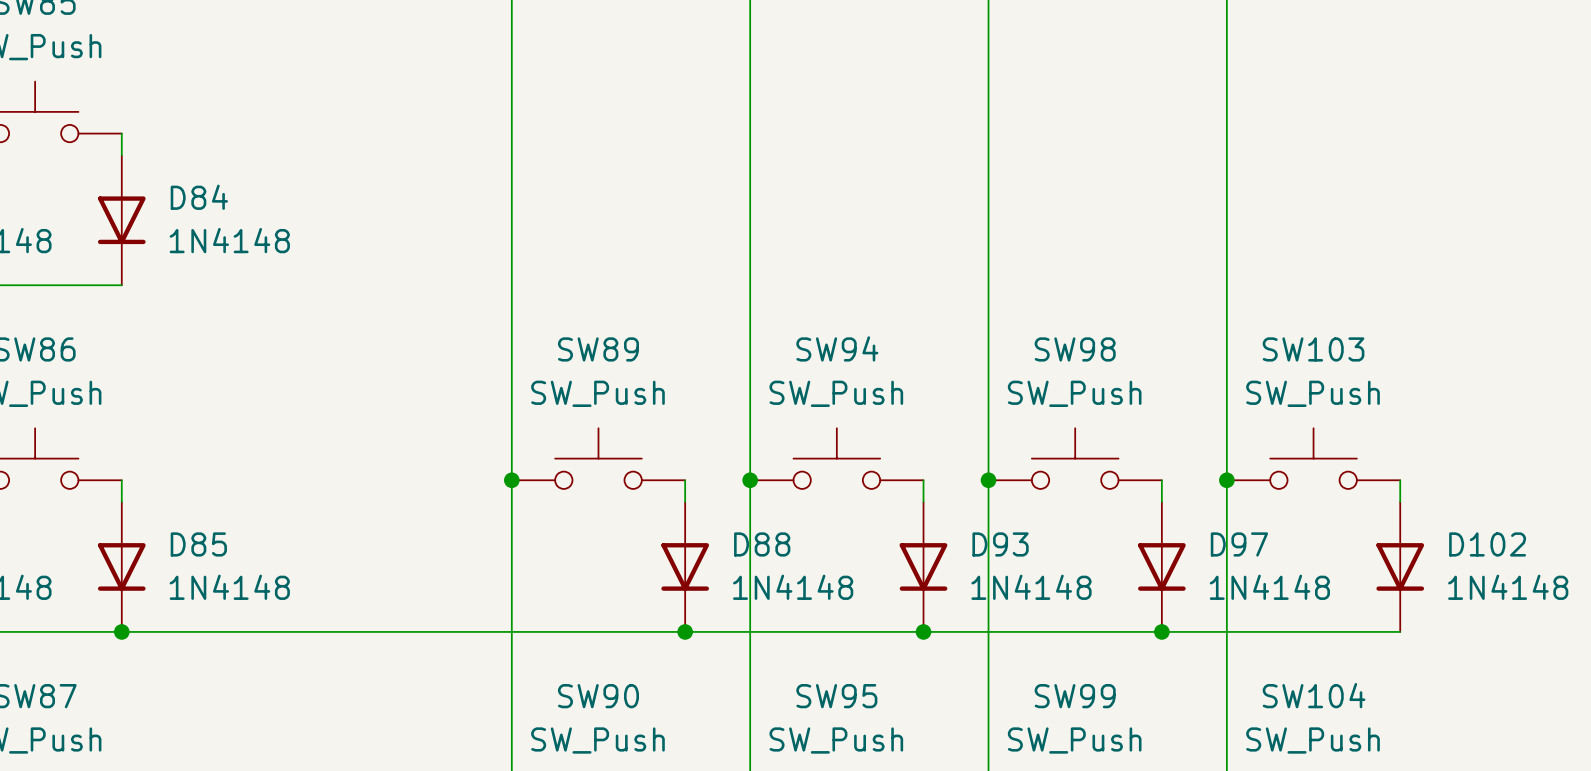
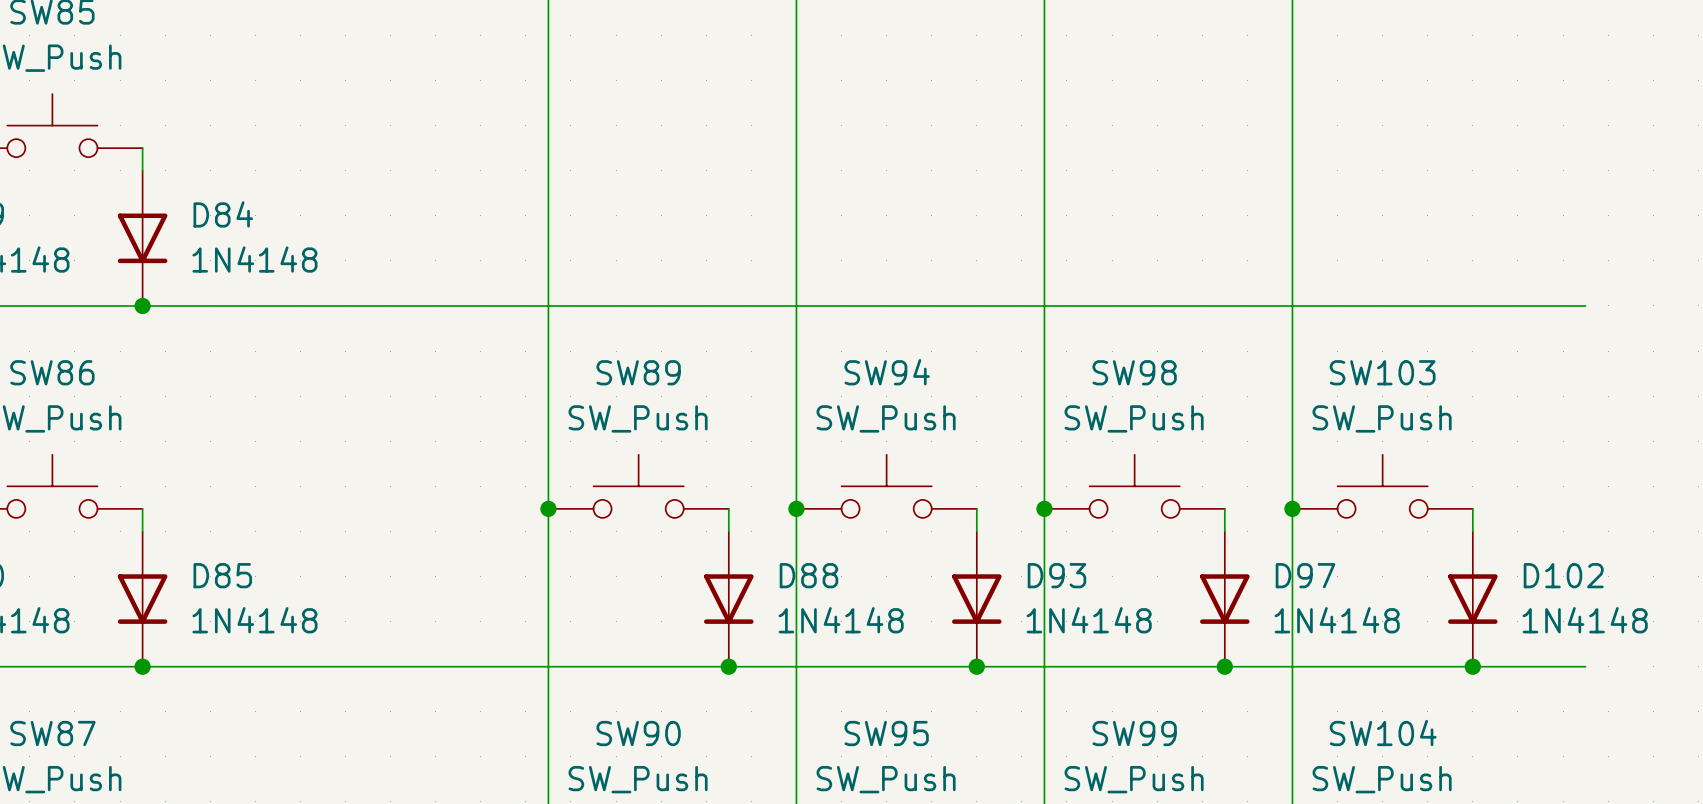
wire: none -> (142, 305) (1585, 305)
junction: none -> (142, 305)
wire: none -> (1472, 666) (1585, 666)
junction: none -> (1472, 666)

